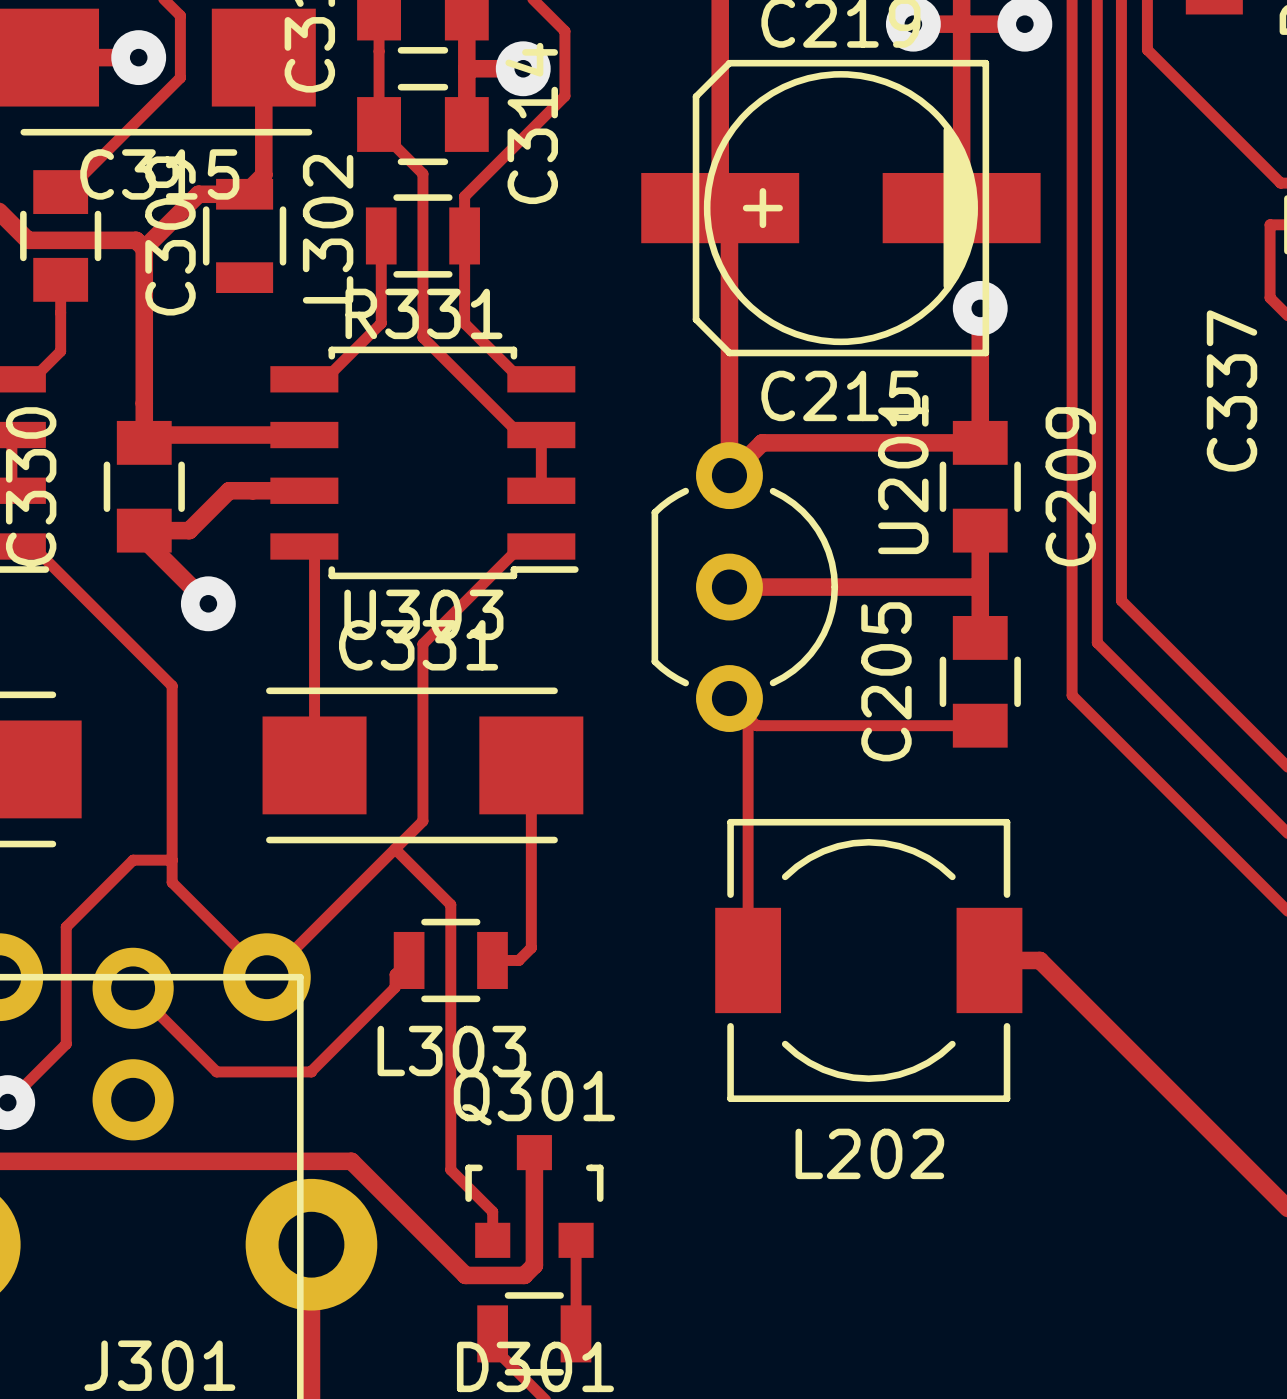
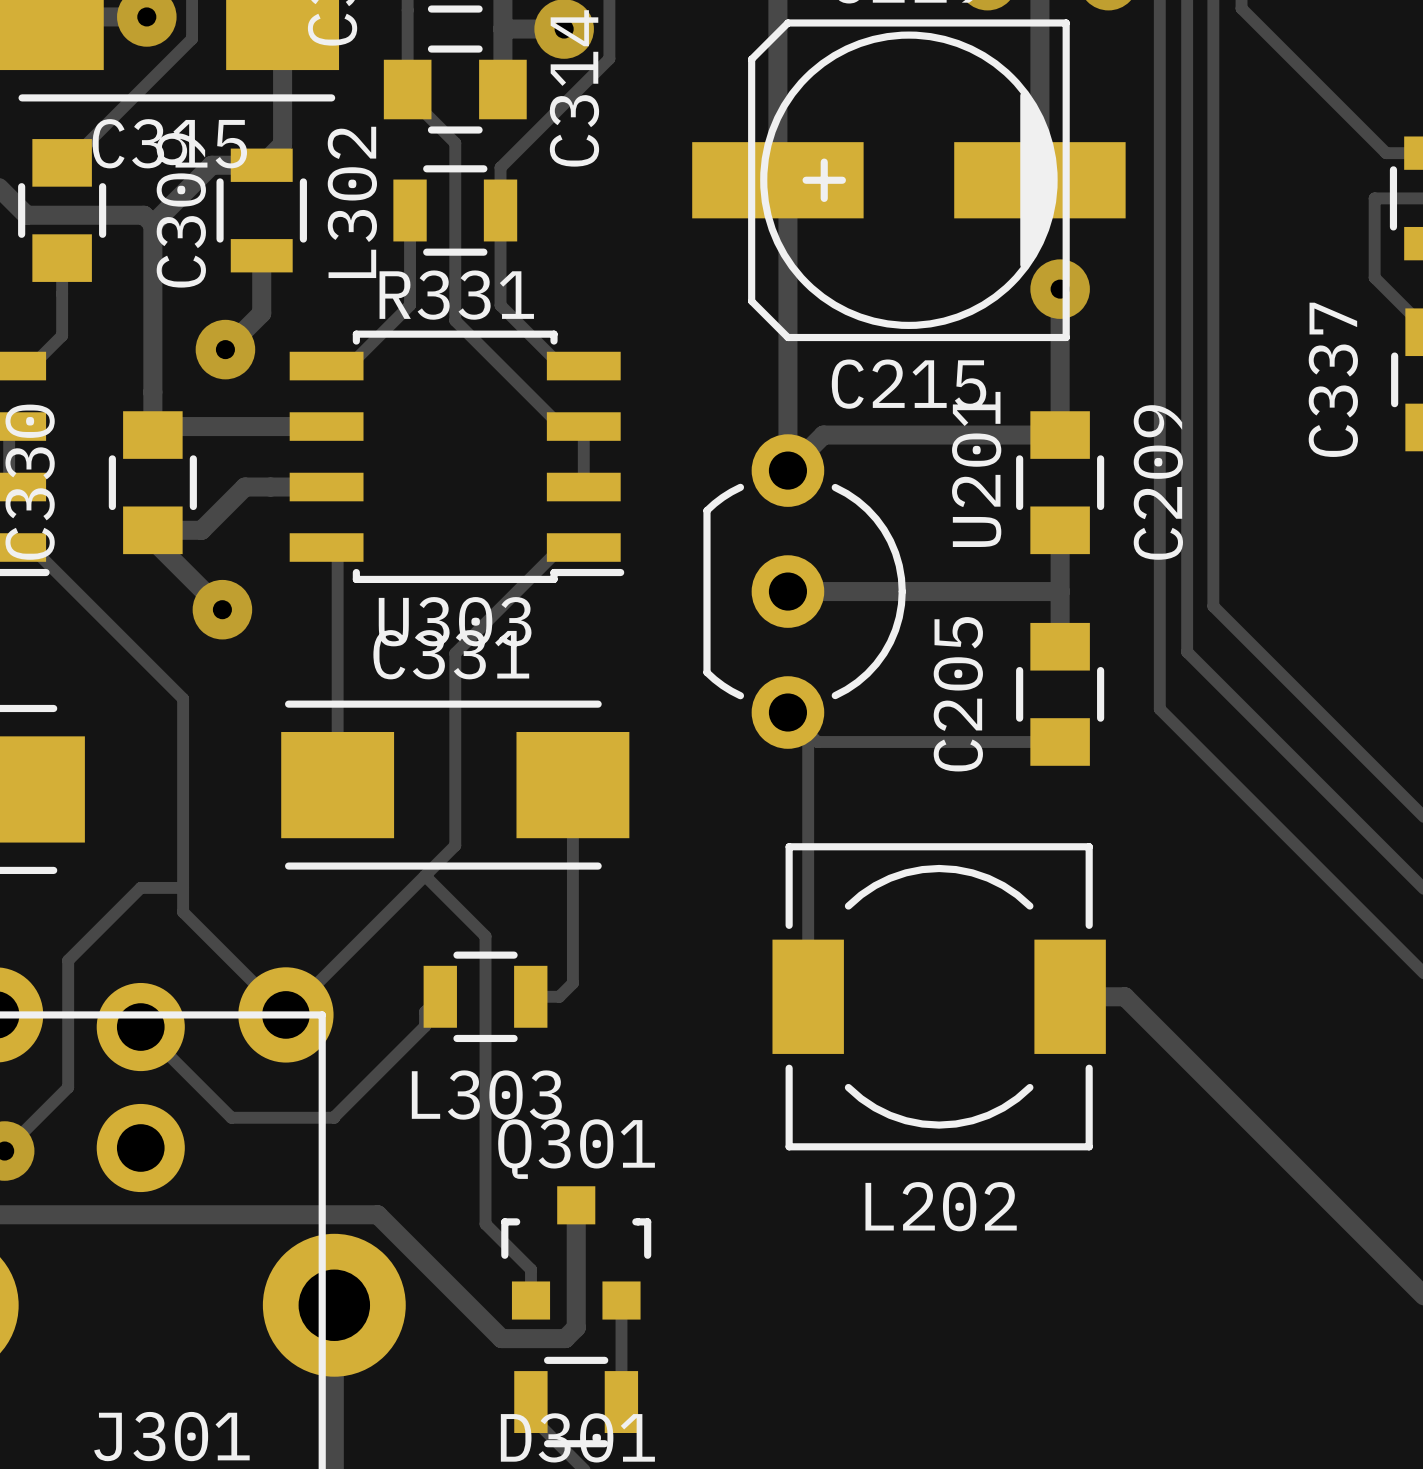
track: none -> (261, 255) (261, 313) (225, 349)
via: none -> (225, 349)

